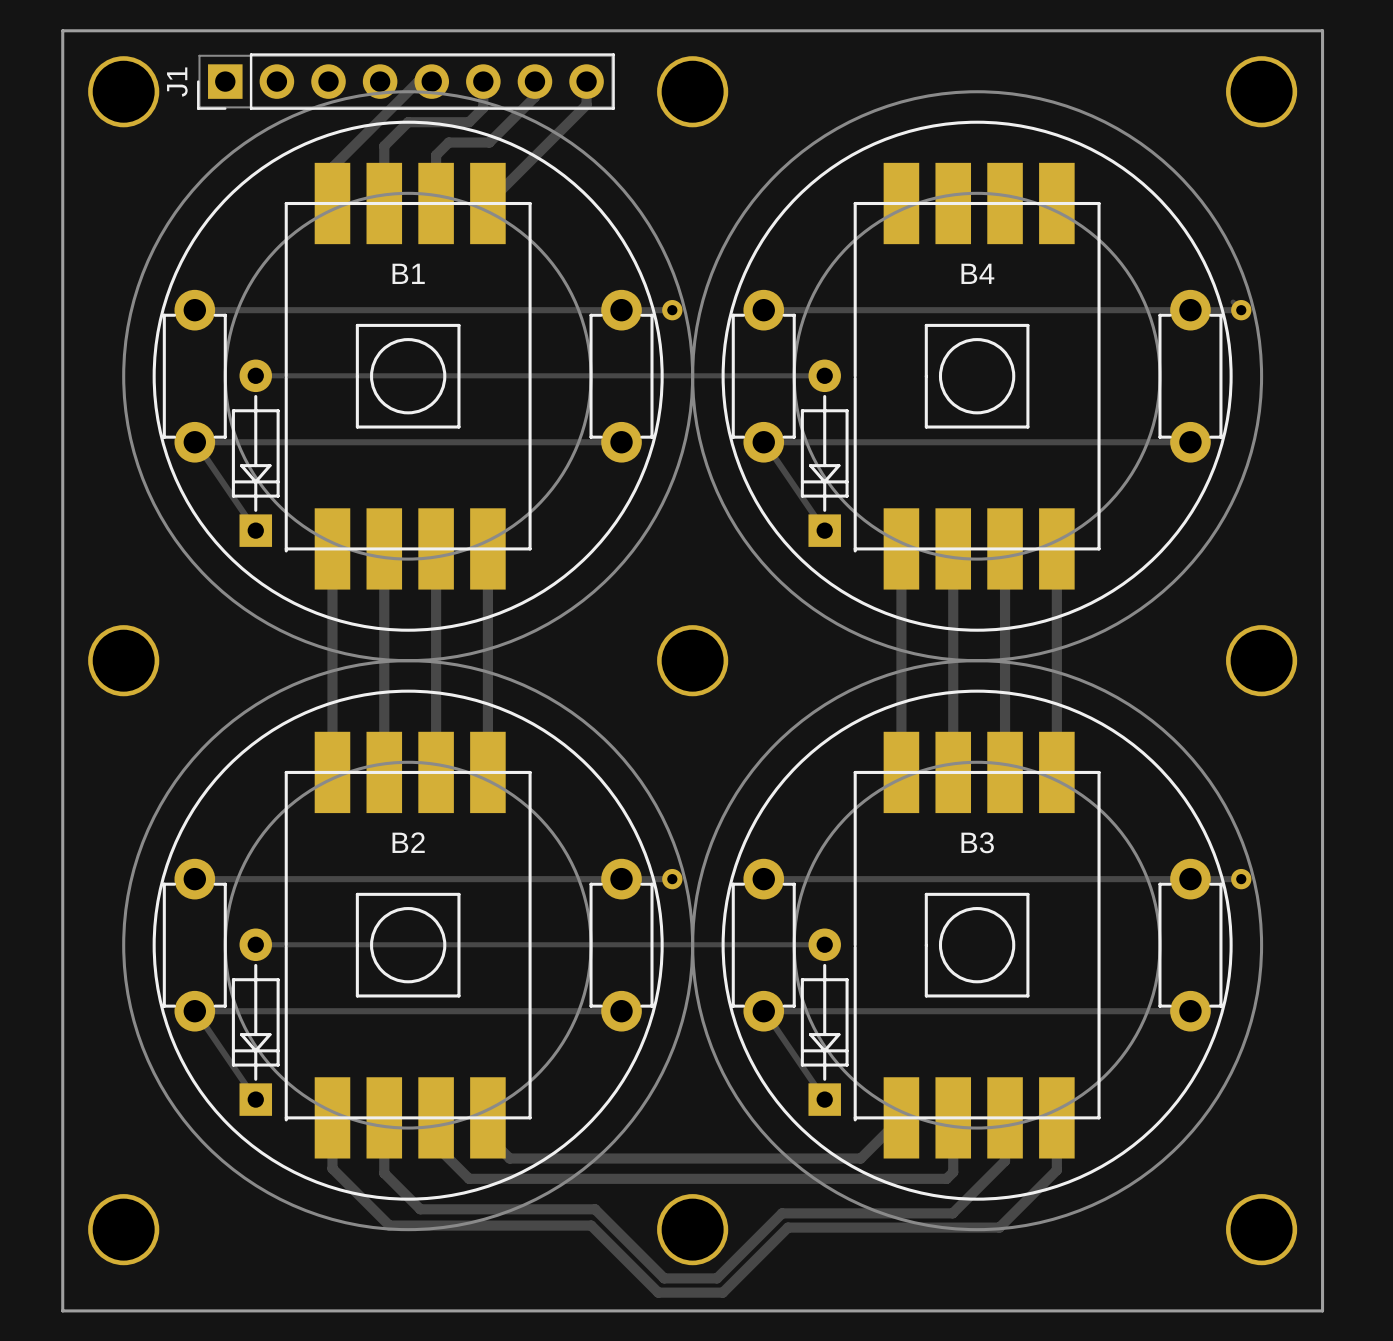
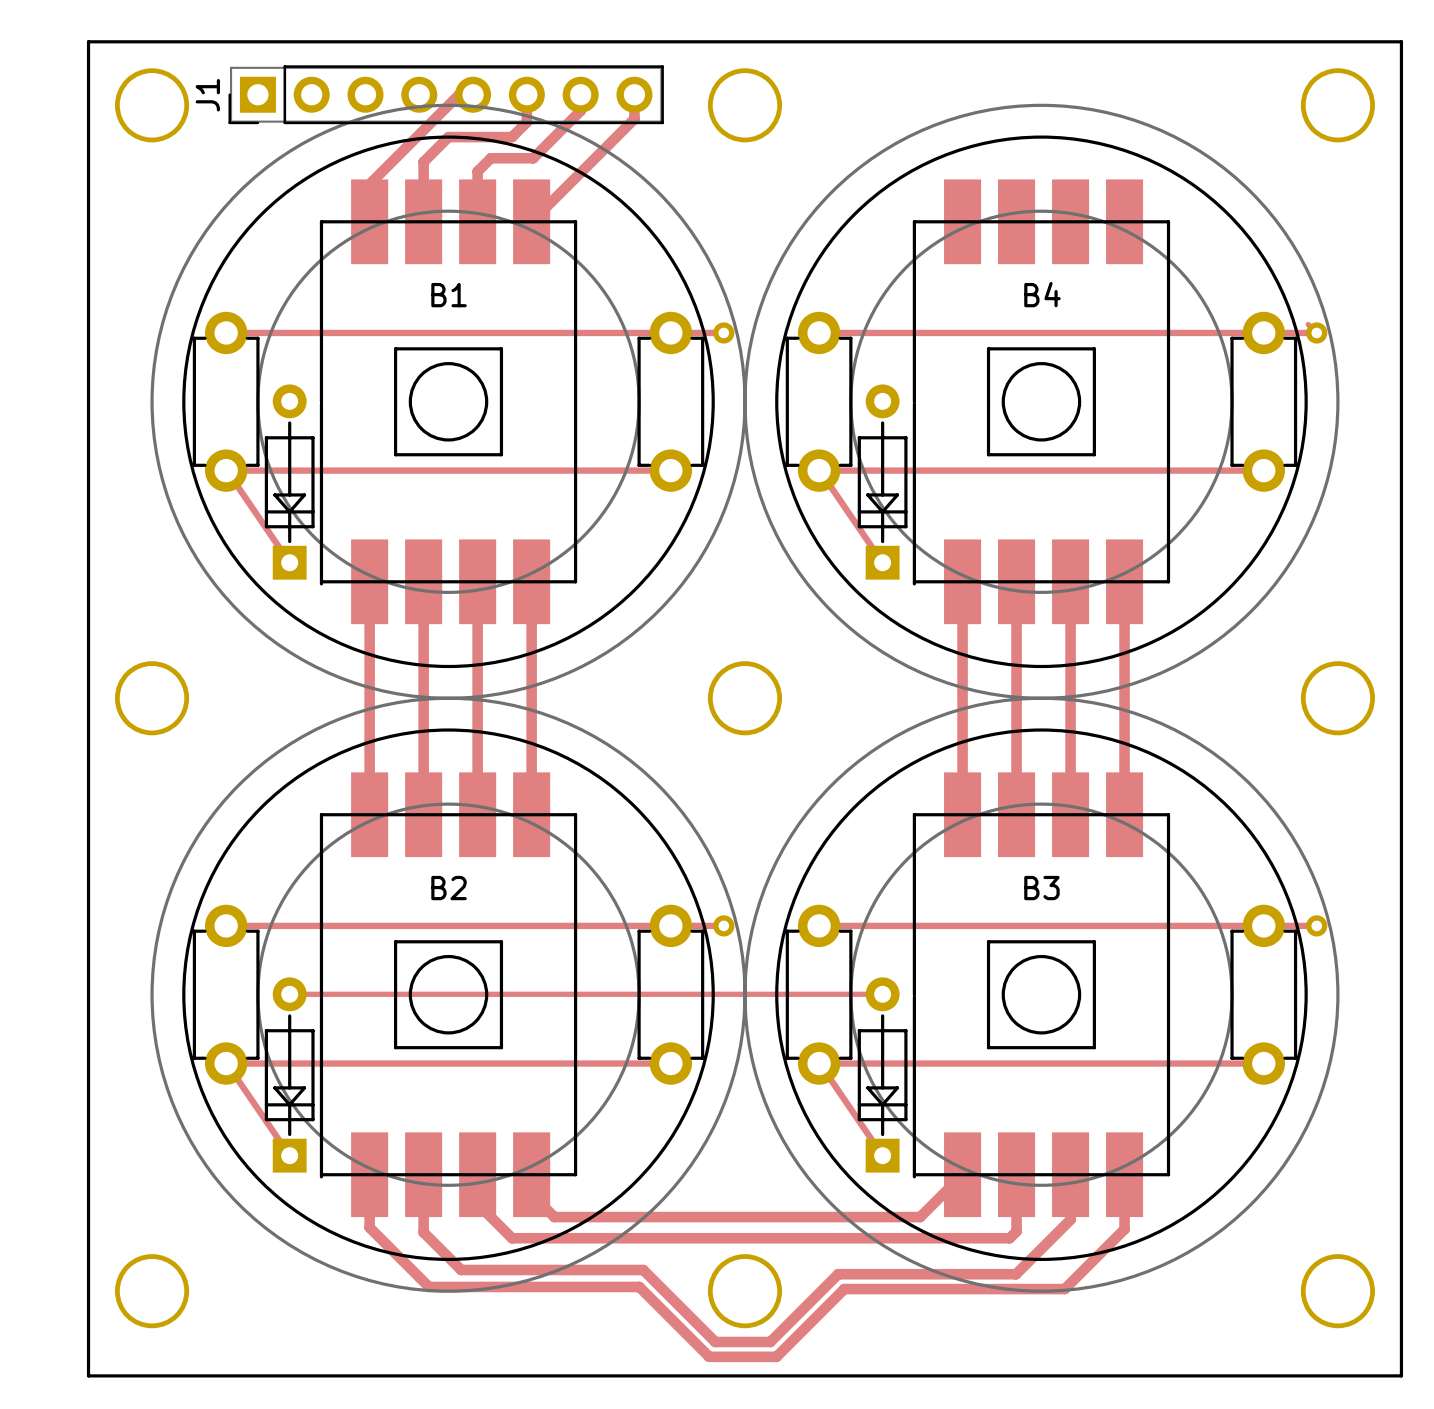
track: (255, 375) (824, 375) -> none

